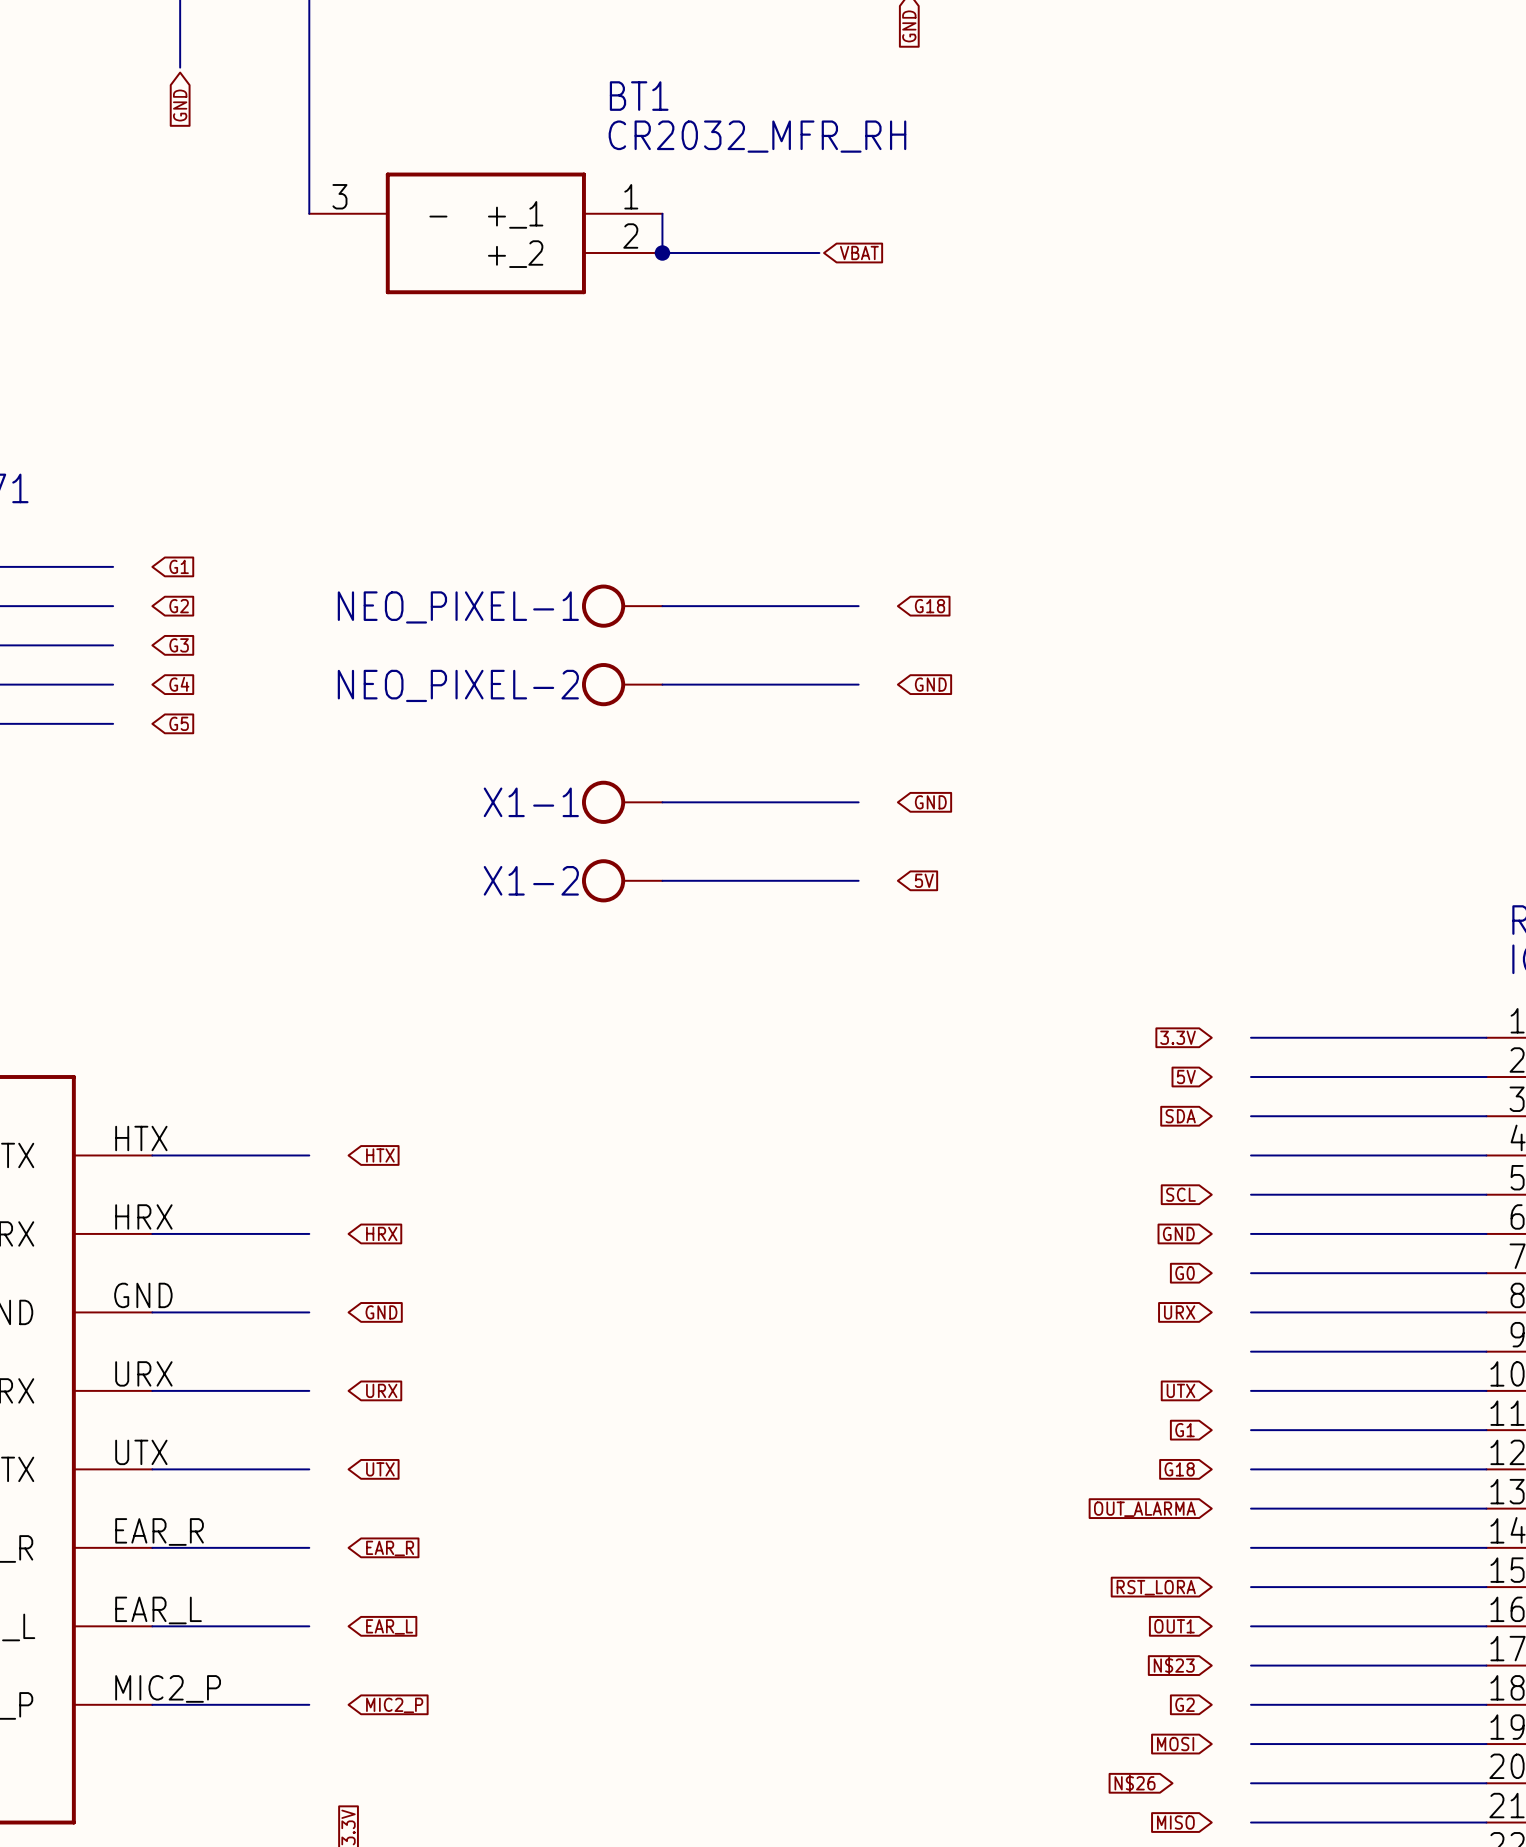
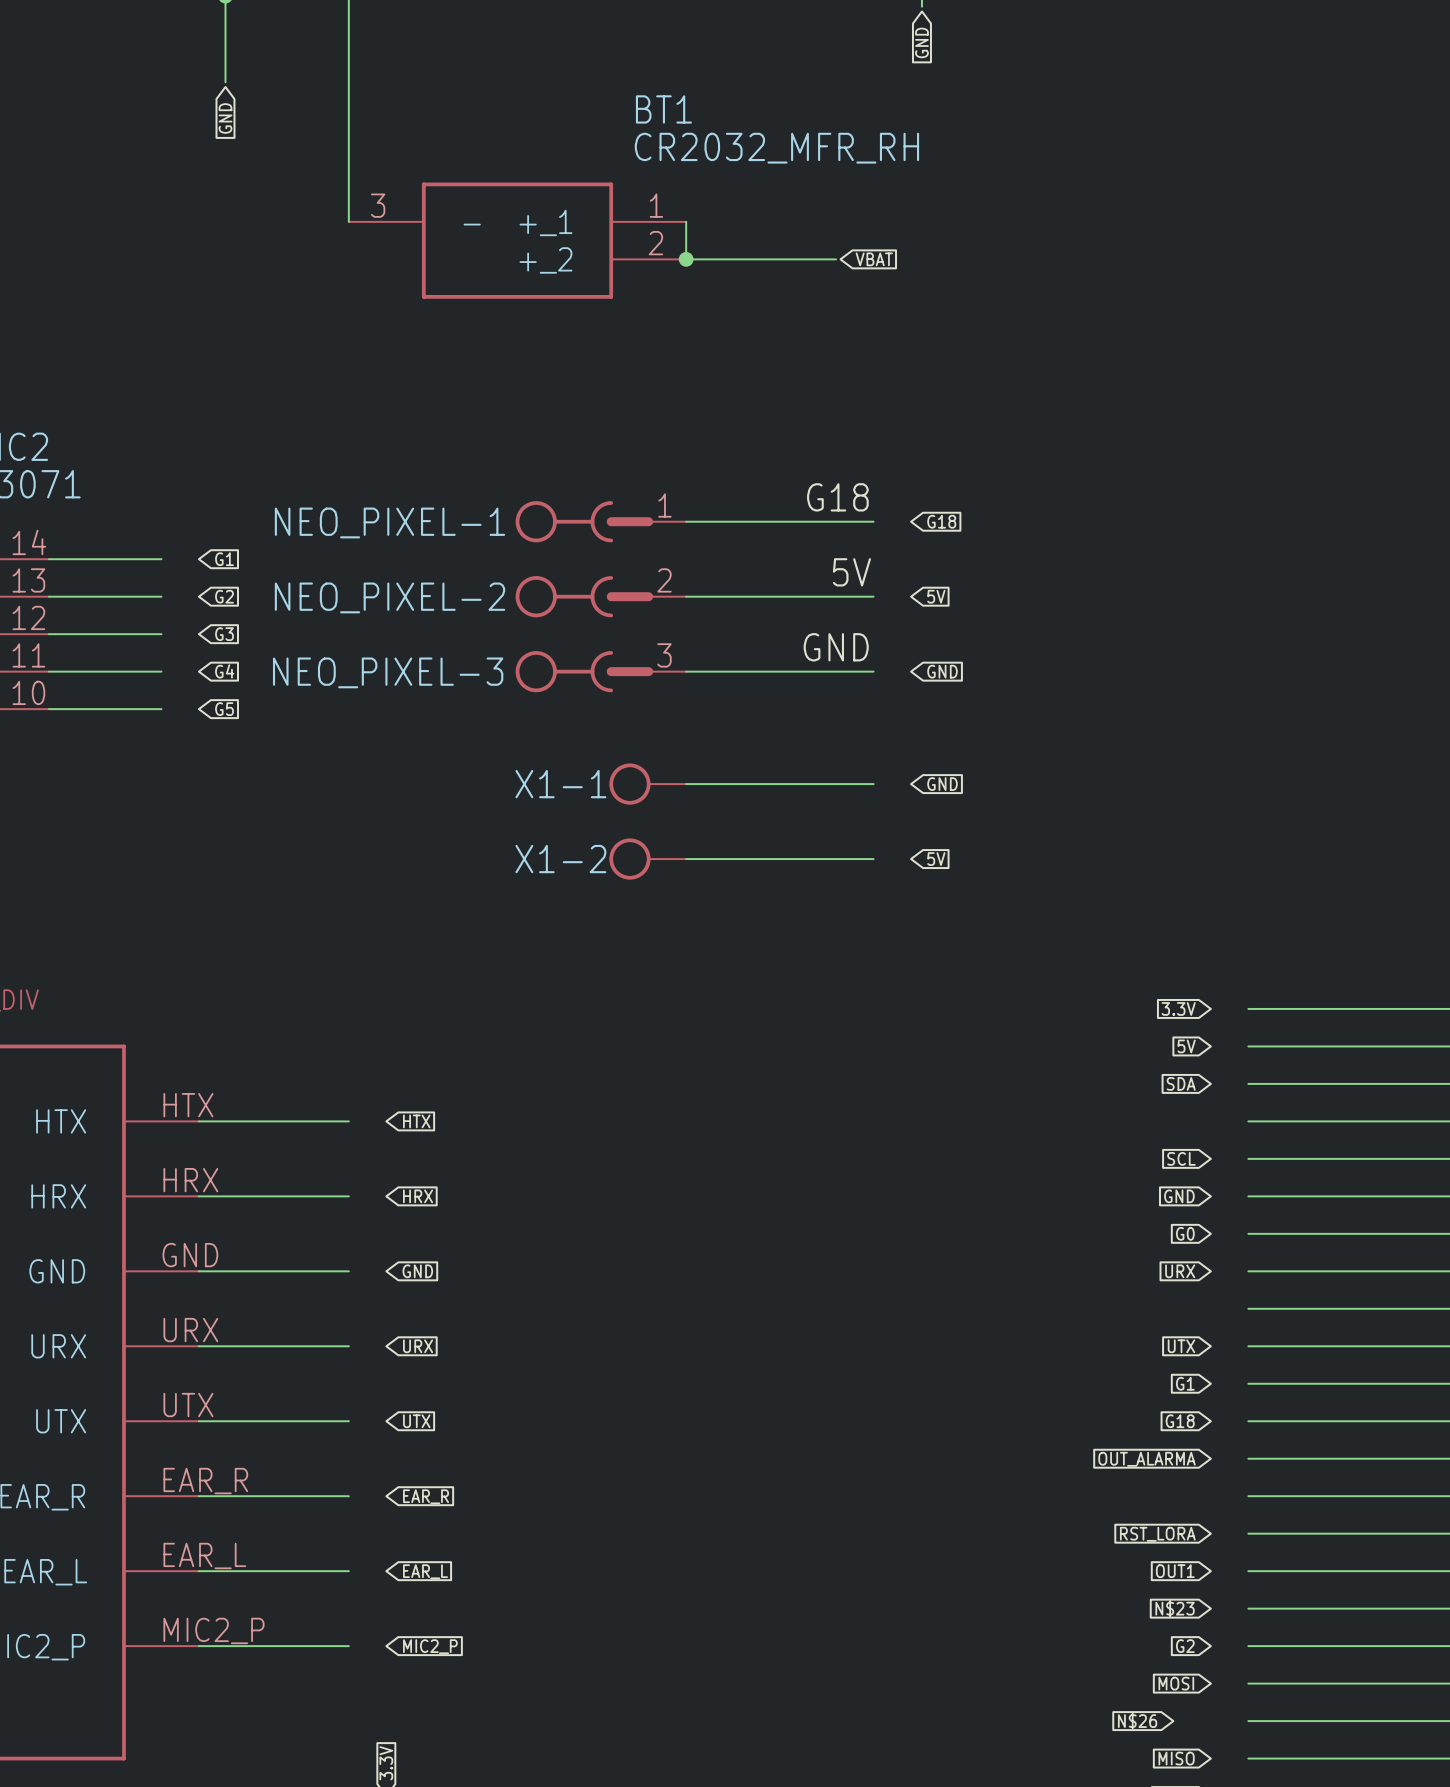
label: none -> G18 (837, 497)
wire: none -> (686, 521) (873, 521)
global label: none -> G18 (941, 521)
label: none -> 5V (851, 572)
NEO_PIXEL-1 symbol: [582, 584, 663, 628] -> [515, 501, 687, 543]
global label: G18 (930, 606) -> 5V (936, 596)
NEO_PIXEL-1 name position: NEO_PIXEL-1 (458, 607) -> NEO_PIXEL-1 (390, 522)
label: none -> GND (836, 647)
NEO_PIXEL-2 symbol: [582, 663, 663, 707] -> [515, 576, 687, 618]
NEO_PIXEL-3: none -> (600, 671)
NEO_PIXEL-2 name position: NEO_PIXEL-2 (458, 685) -> NEO_PIXEL-2 (390, 597)

